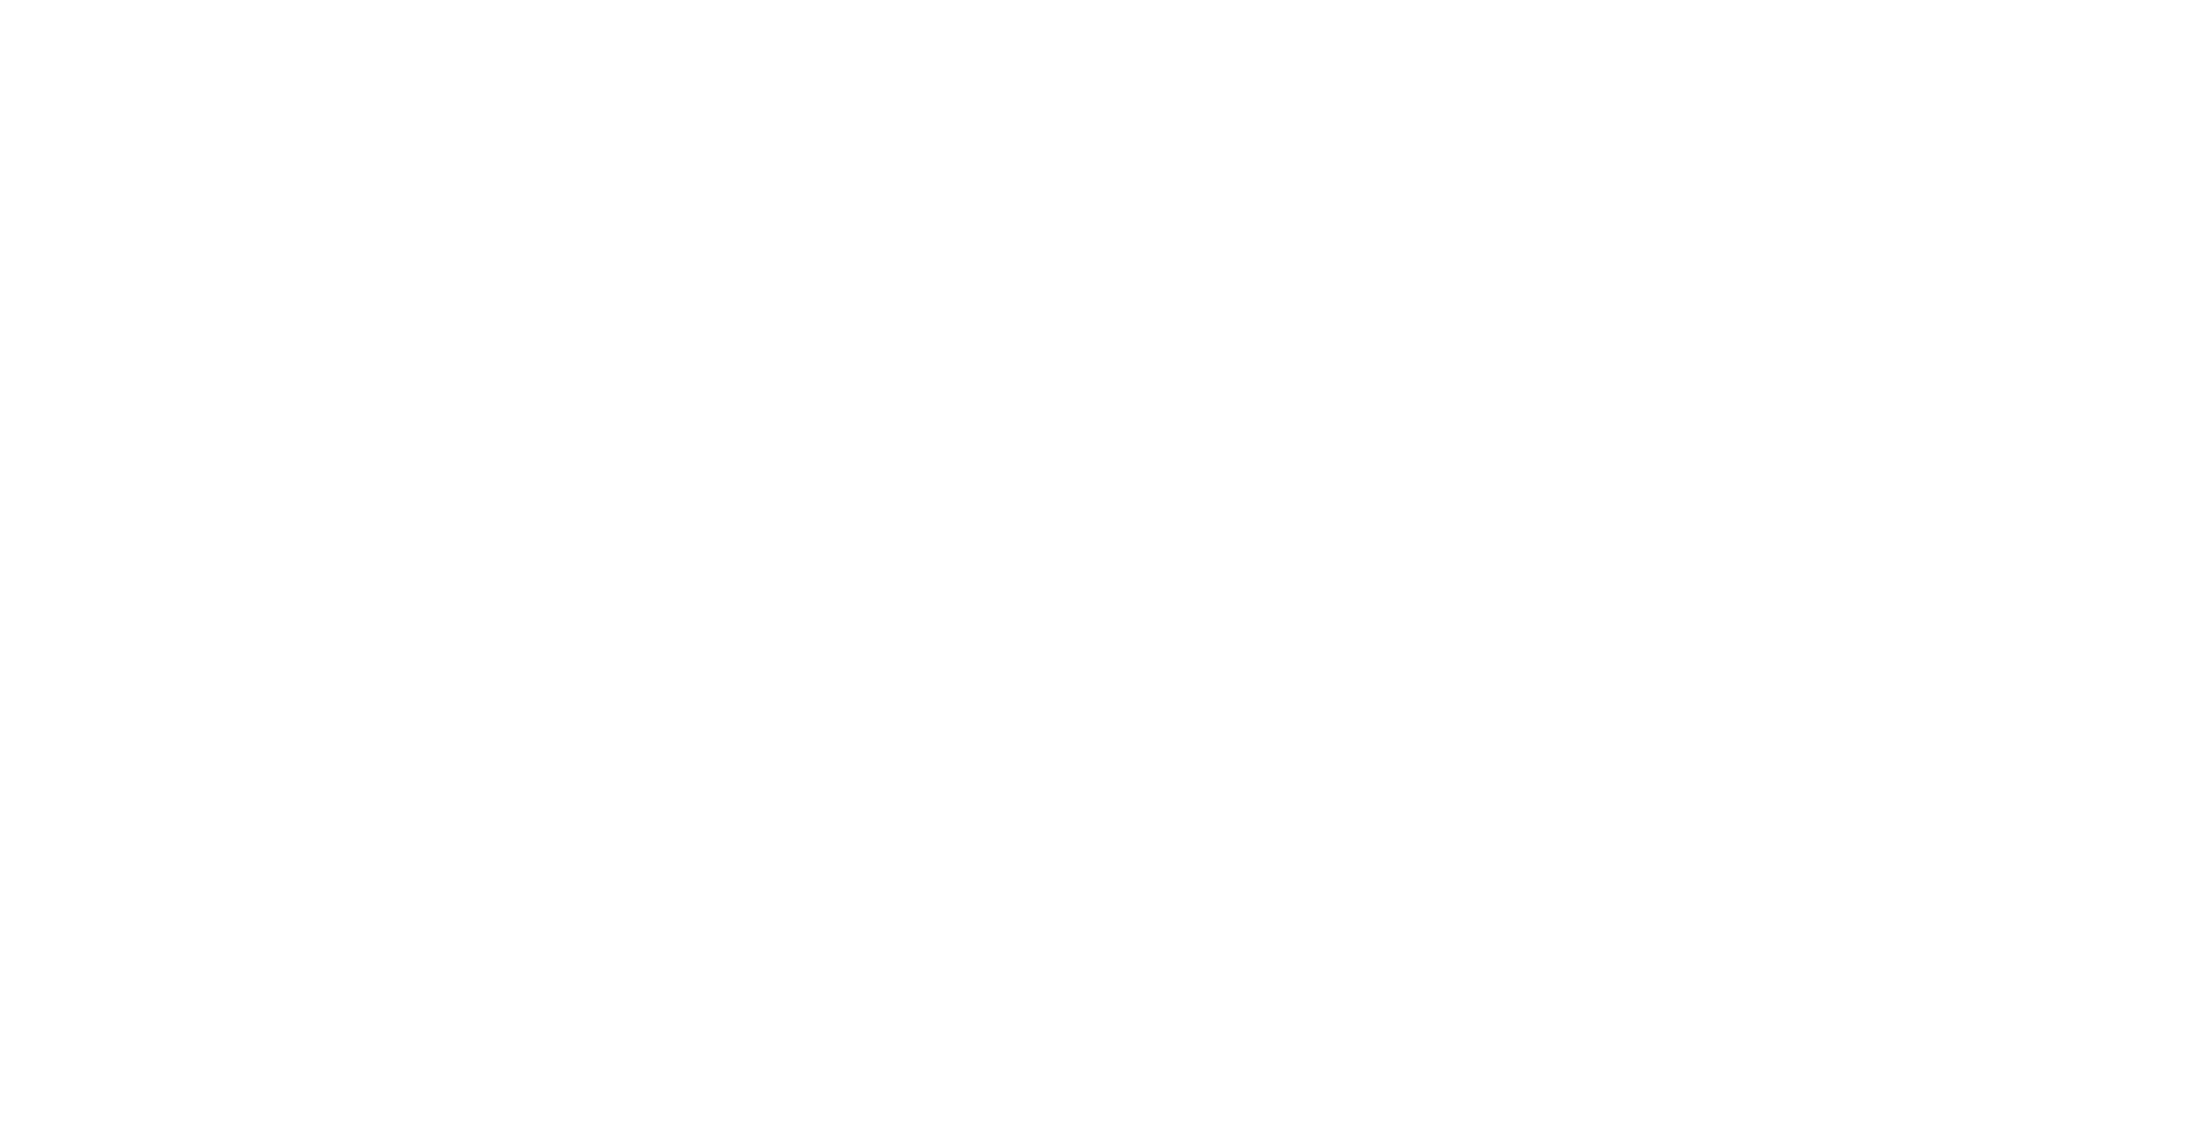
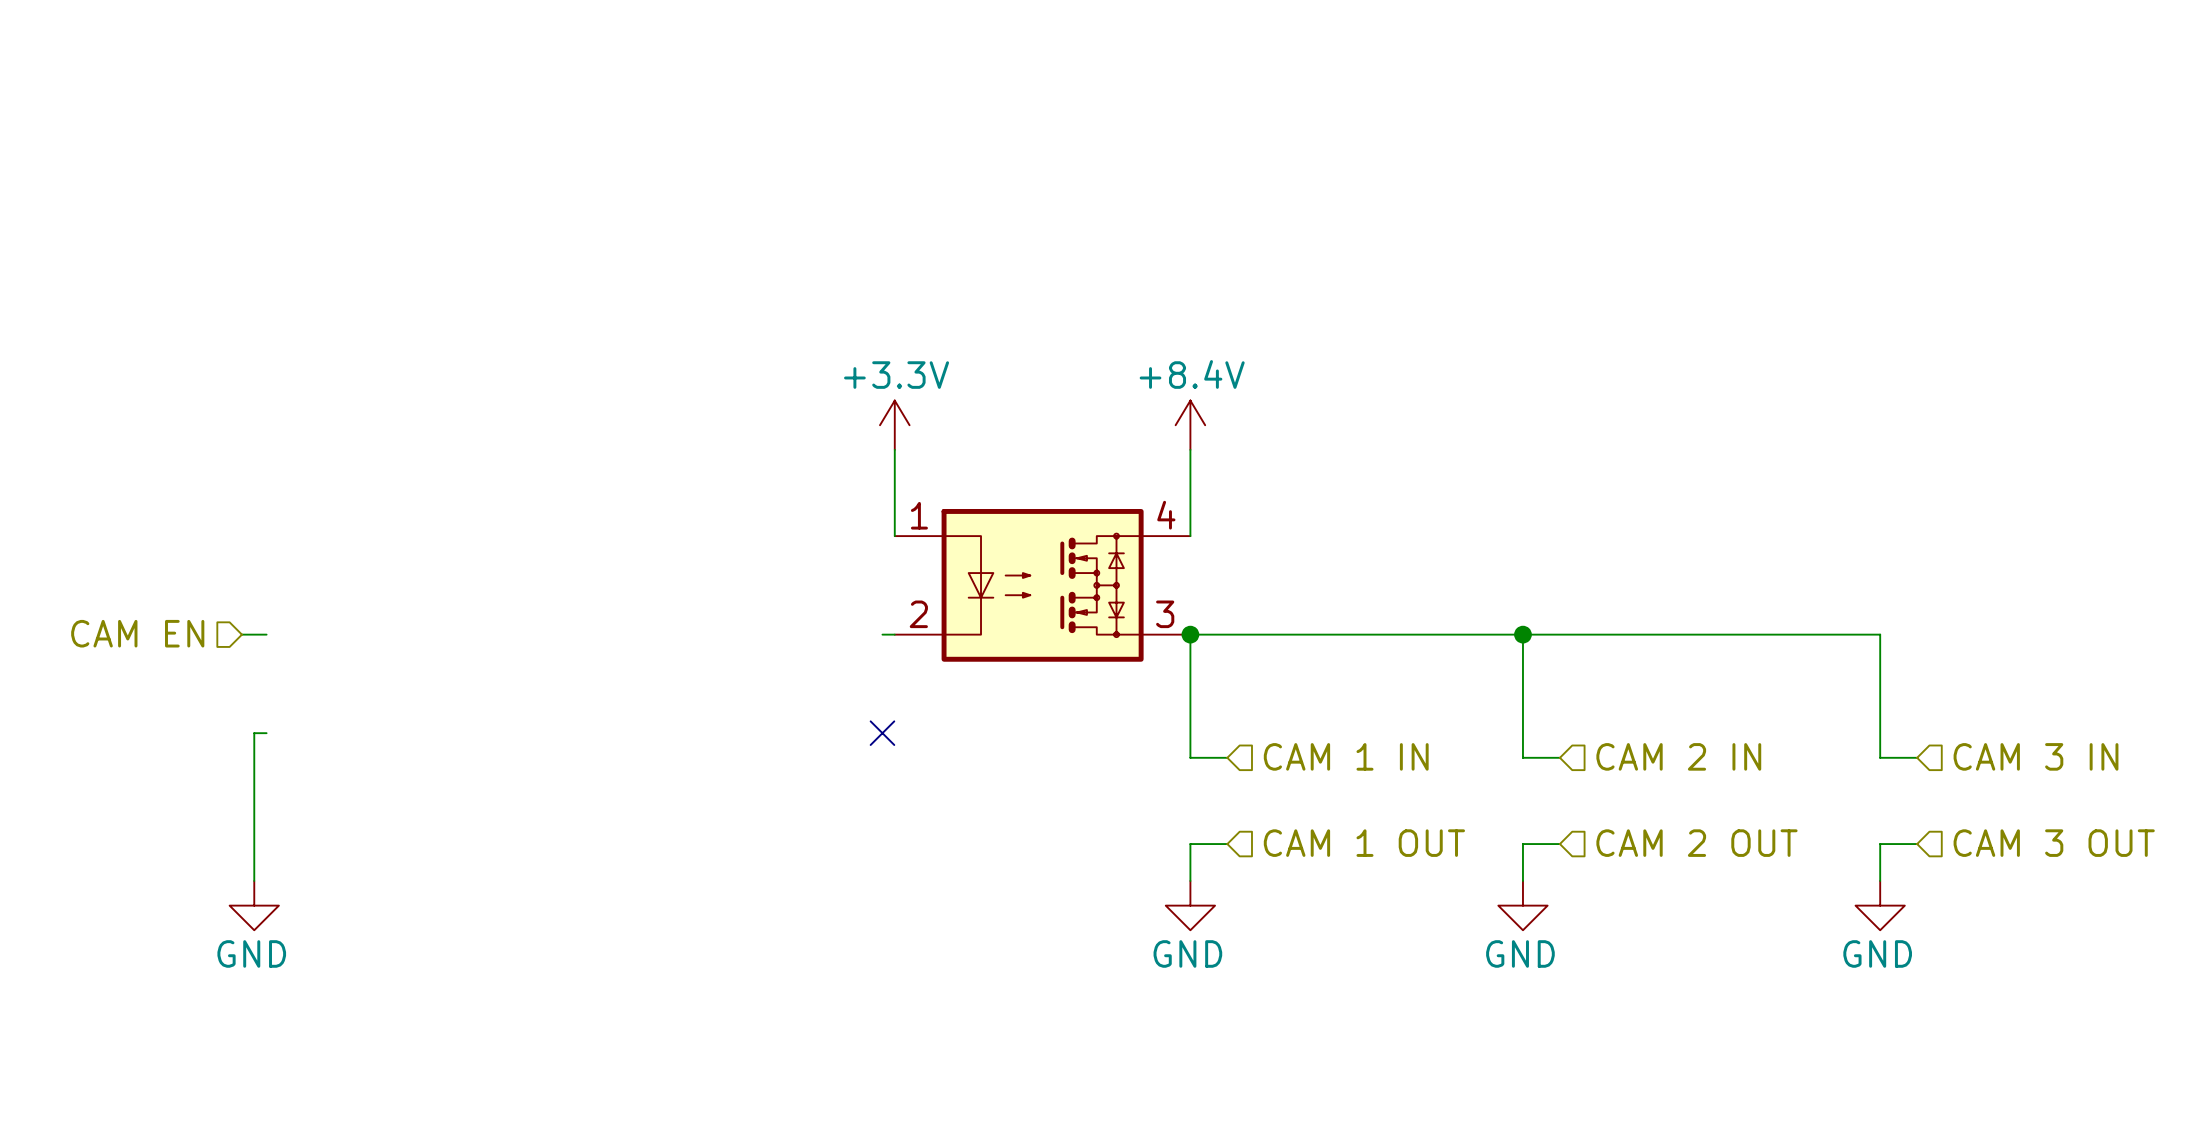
power symbol: none -> +3.3V (894, 425)
power symbol: none -> +8.4V (1190, 425)
wire: none -> (894, 449) (894, 536)
wire: none -> (1190, 449) (1190, 536)
part: none -> (1042, 585)
hierarchical label: none -> CAM EN (137, 633)
wire: none -> (241, 634) (266, 634)
wire: none -> (882, 634) (894, 634)
junction: none -> (1190, 634)
wire: none -> (1522, 634) (1522, 757) (1559, 757)
junction: none -> (1522, 634)
wire: none -> (266, 733) (254, 733) (254, 880)
no-connect mark: none -> (882, 733)
hierarchical label: none -> CAM 1 IN (1346, 756)
hierarchical label: none -> CAM 2 IN (1678, 756)
hierarchical label: none -> CAM 3 IN (2036, 756)
wire: none -> (1227, 757) (1190, 757) (1190, 634) (1880, 634) (1880, 757) (1917, 757)
hierarchical label: none -> CAM 1 OUT (1364, 843)
hierarchical label: none -> CAM 2 OUT (1696, 843)
hierarchical label: none -> CAM 3 OUT (2054, 843)
wire: none -> (1227, 844) (1190, 844) (1190, 880)
wire: none -> (1559, 844) (1522, 844) (1522, 880)
wire: none -> (1917, 844) (1880, 844) (1880, 880)
power symbol: none -> GND (254, 905)
power symbol: none -> GND (1190, 905)
power symbol: none -> GND (1522, 905)
power symbol: none -> GND (1880, 905)

